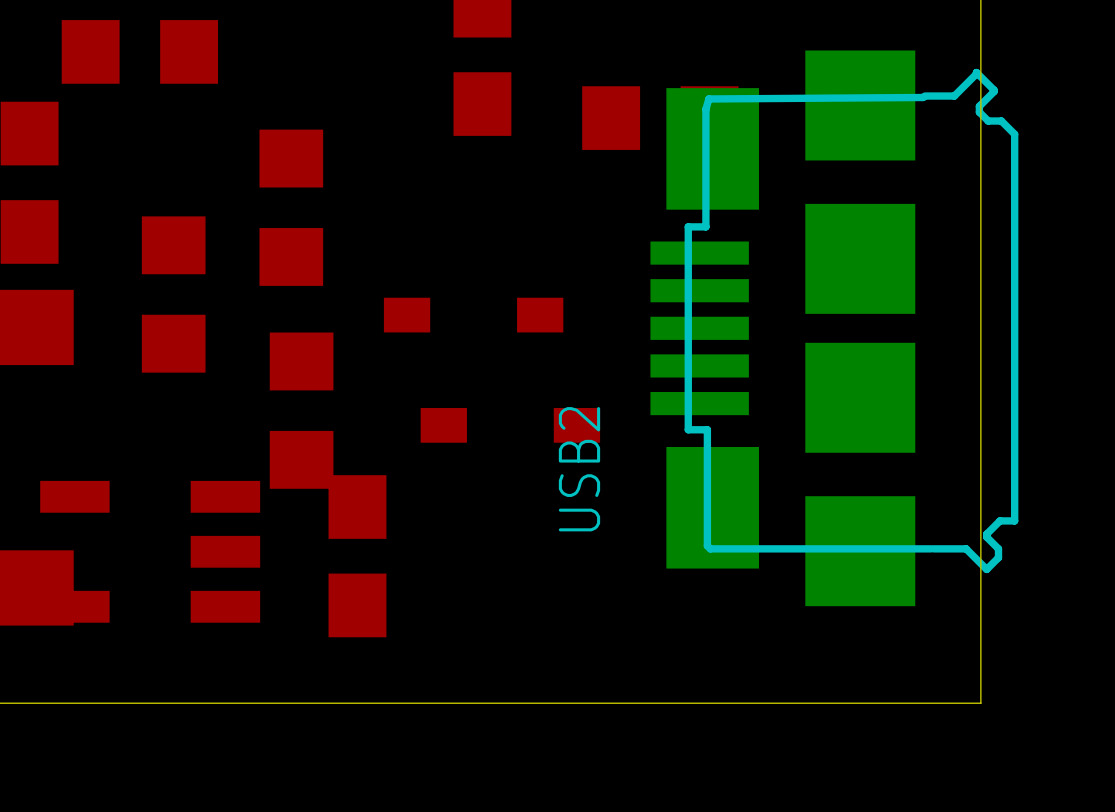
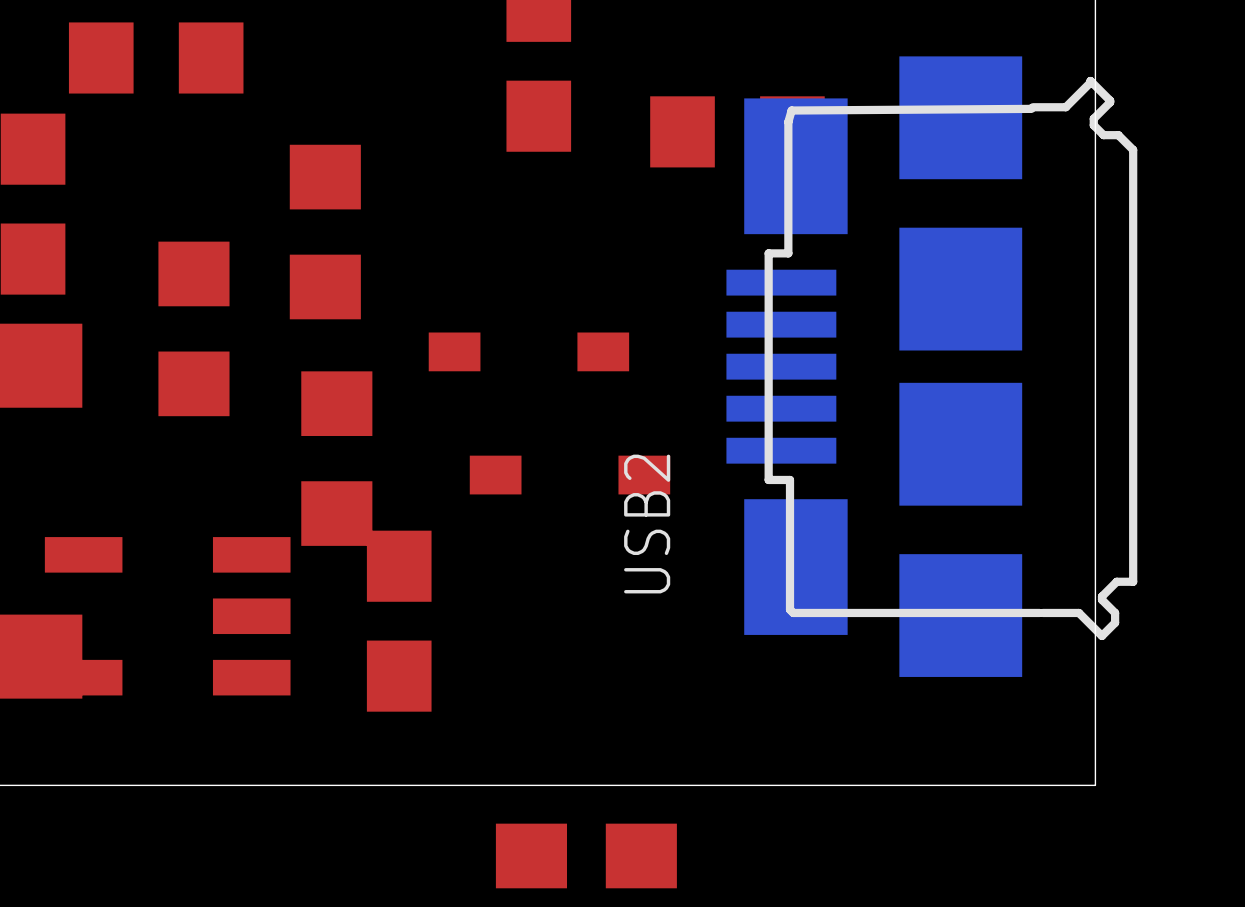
part: none -> (586, 855)

